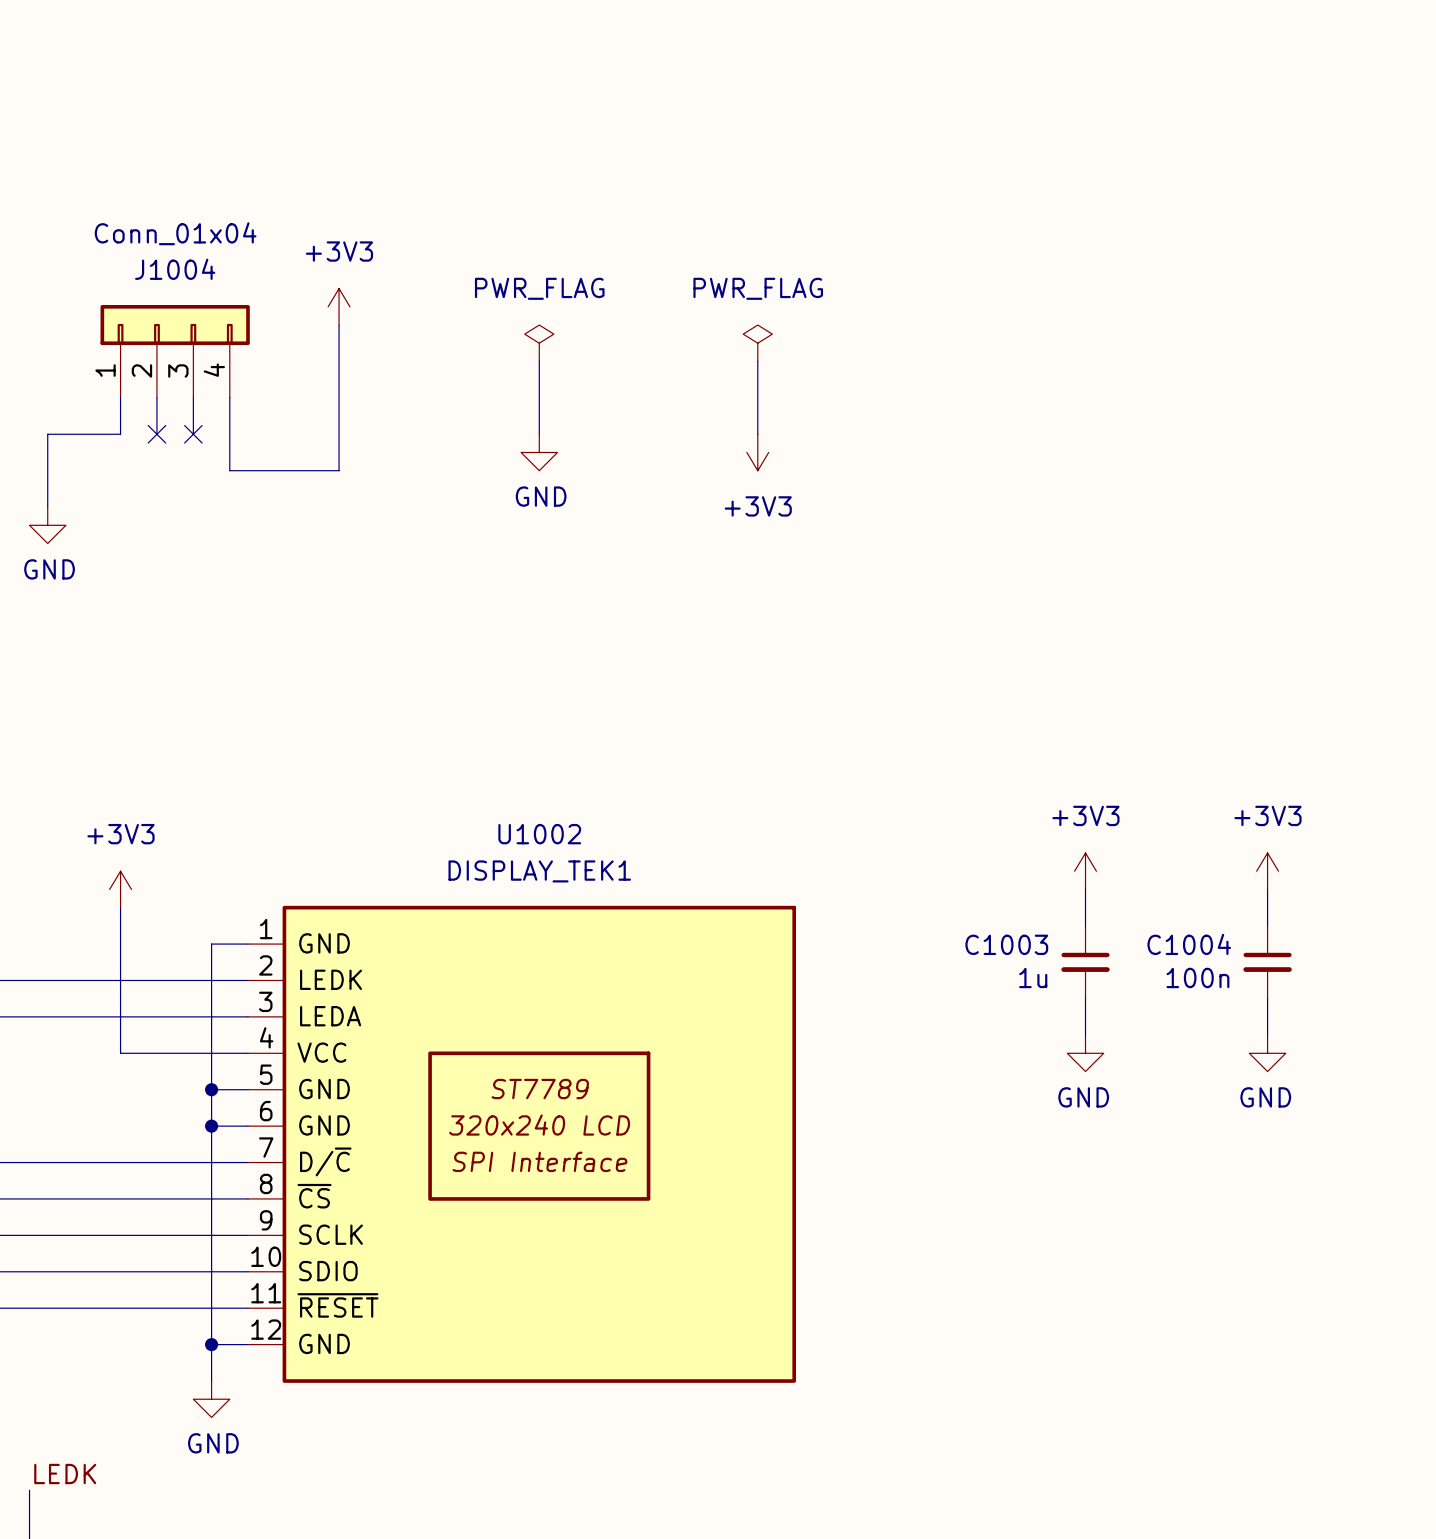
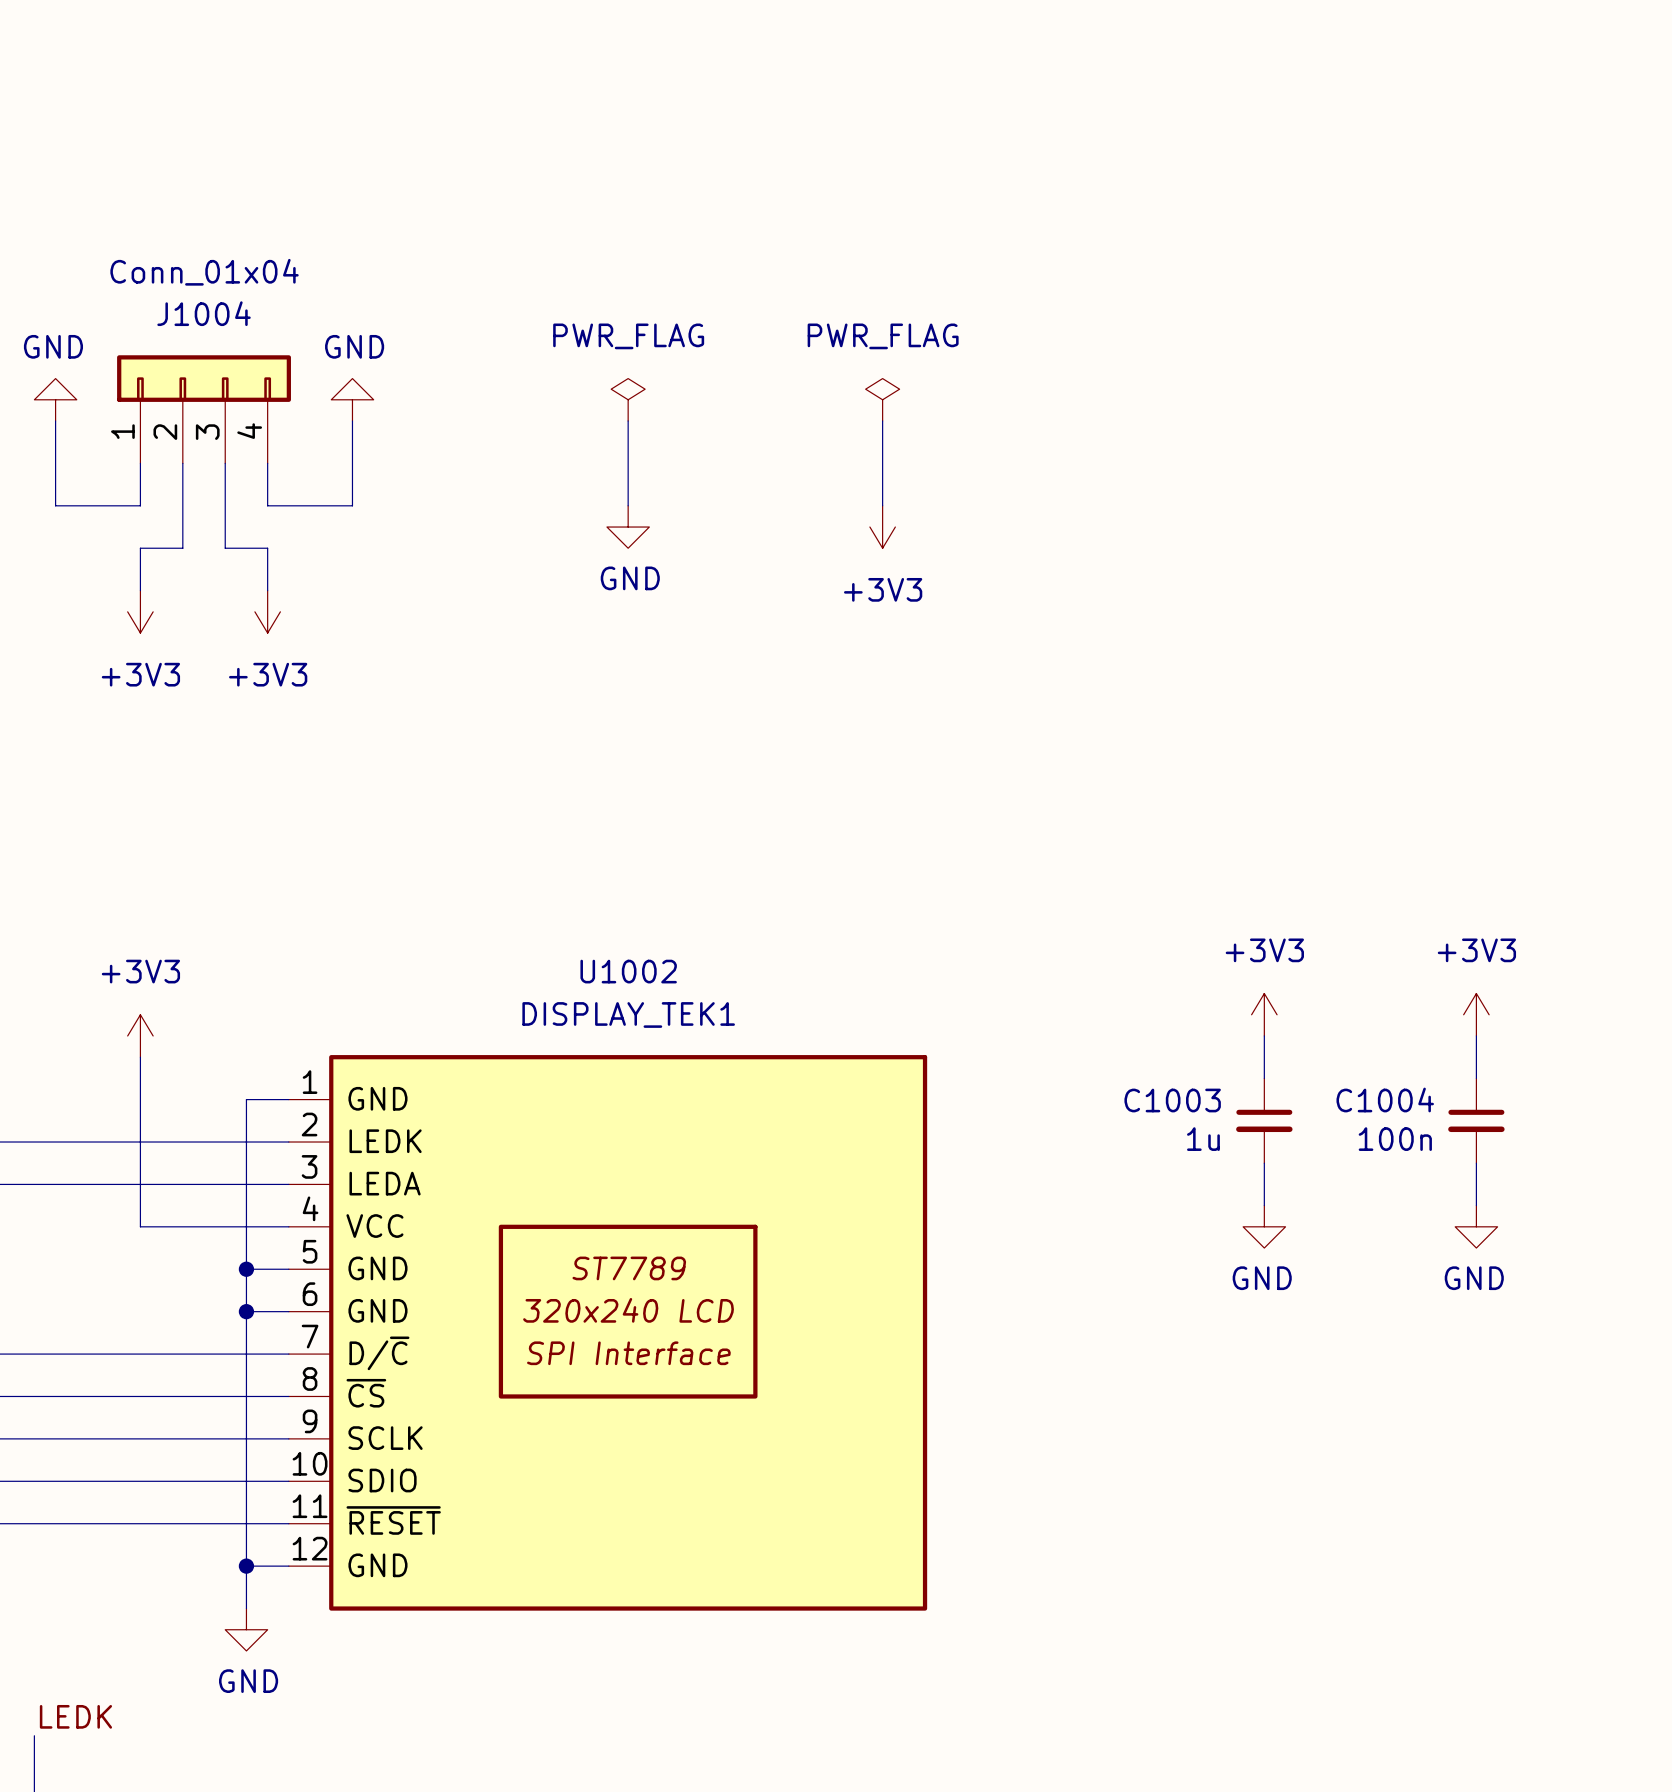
power symbol: +3V3 (339, 306) -> none
wire: (339, 325) (339, 470) (229, 470) (229, 434) -> (352, 420) (352, 505) (267, 505)
power symbol: none -> GND (55, 399)
power symbol: none -> GND (352, 399)
wire: (47, 434) (47, 507) -> (55, 505) (55, 420)
wire: none -> (182, 505) (182, 548) (140, 548) (140, 590)
no-connect mark: (156, 434) -> none
wire: none -> (225, 505) (225, 548) (267, 548) (267, 590)
no-connect mark: (193, 434) -> none
power symbol: GND (47, 525) -> none
power symbol: none -> +3V3 (140, 611)
power symbol: none -> +3V3 (267, 611)

